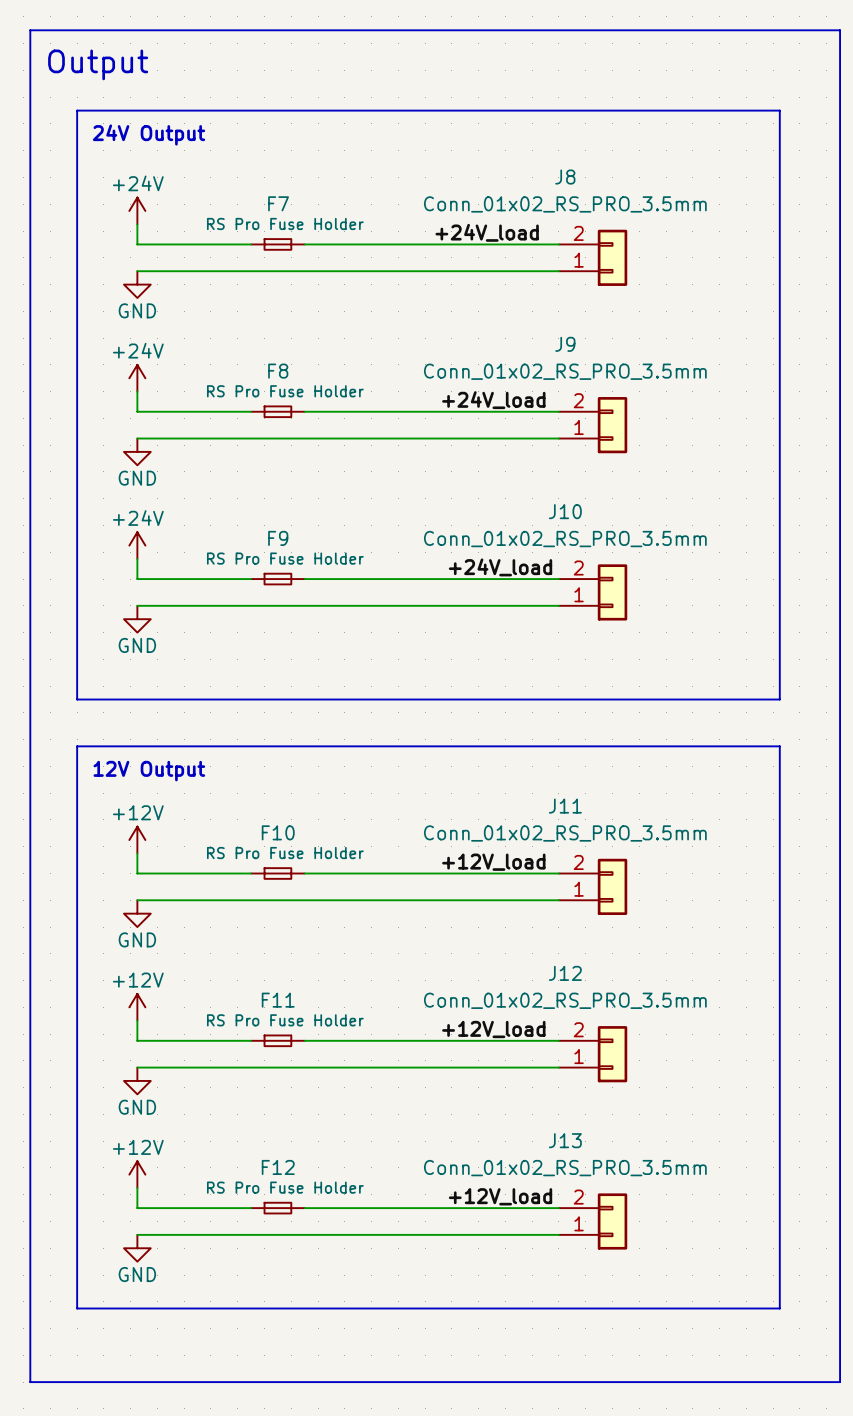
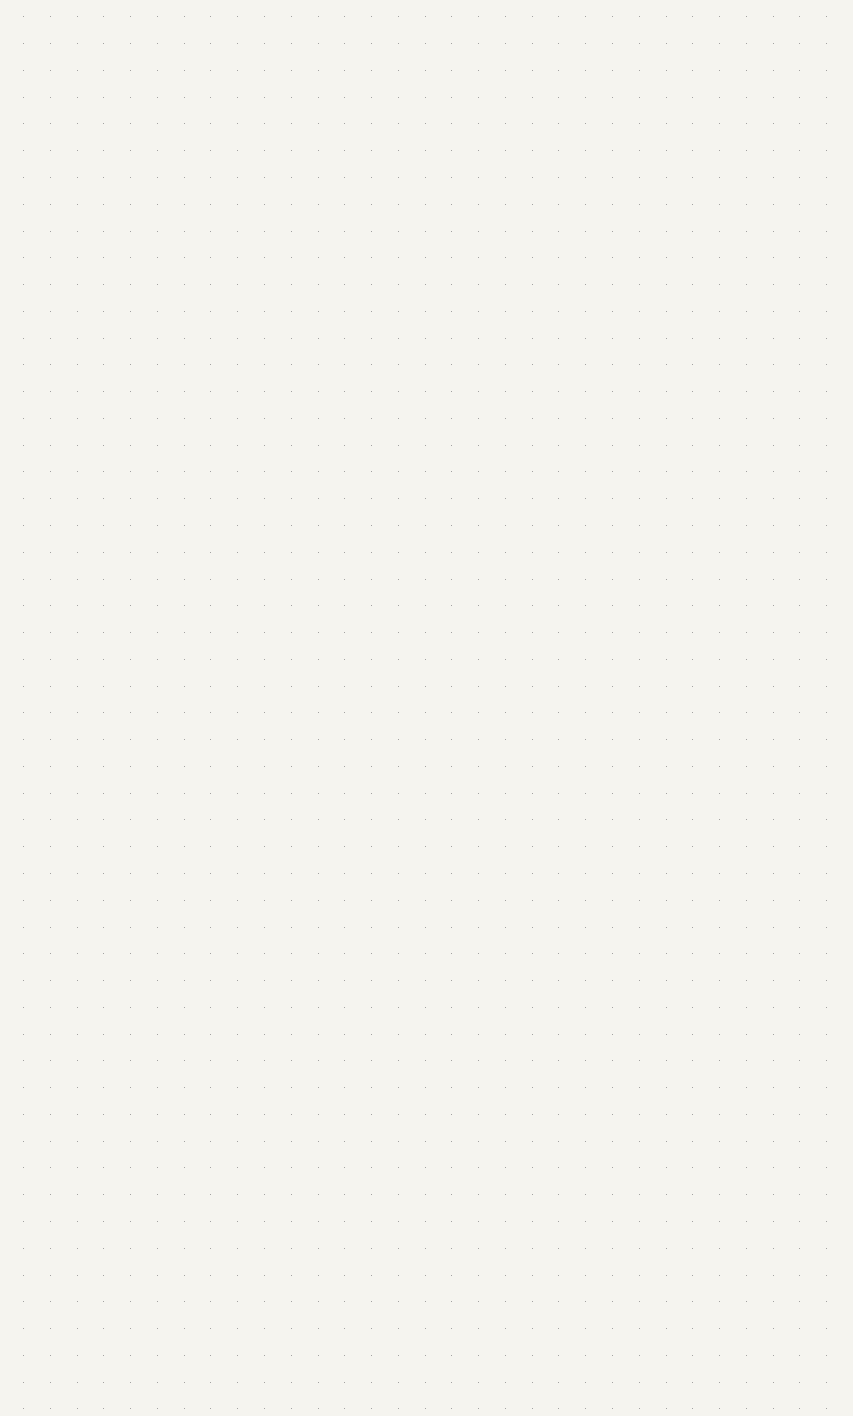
line: (30, 30) (840, 30) (840, 1382) (30, 1382) (30, 30) -> none
text: Output (98, 64) -> none
line: (77, 110) (779, 110) (779, 699) (77, 699) (77, 110) -> none
text: 24V Output (149, 135) -> none
power symbol: +24V (137, 210) -> none
wire: (137, 224) (137, 244) (251, 244) -> none
label: +24V_load (487, 232) -> none
F7: RS Pro Fuse Holder (277, 244) -> none
wire: (304, 244) (558, 244) -> none
J8: Conn_01x02_RS_PRO_3.5mm (593, 257) -> none
wire: (137, 271) (558, 271) -> none
power symbol: GND (137, 284) -> none
power symbol: +24V (137, 378) -> none
wire: (137, 391) (137, 411) (251, 411) -> none
label: +24V_load (493, 400) -> none
F8: RS Pro Fuse Holder (277, 411) -> none
wire: (304, 411) (558, 411) -> none
J9: Conn_01x02_RS_PRO_3.5mm (593, 425) -> none
wire: (137, 438) (558, 438) -> none
power symbol: GND (137, 451) -> none
power symbol: +24V (137, 545) -> none
wire: (137, 558) (137, 579) (251, 579) -> none
label: +24V_load (500, 567) -> none
F9: RS Pro Fuse Holder (277, 579) -> none
wire: (304, 579) (558, 579) -> none
J10: Conn_01x02_RS_PRO_3.5mm (593, 592) -> none
wire: (137, 605) (558, 605) -> none
power symbol: GND (137, 619) -> none
line: (77, 746) (77, 1308) (779, 1308) (779, 746) (77, 746) -> none
text: 12V Output (149, 771) -> none
power symbol: +12V (137, 840) -> none
wire: (137, 853) (137, 873) (251, 873) -> none
label: +12V_load (493, 862) -> none
F10: RS Pro Fuse Holder (277, 873) -> none
wire: (304, 873) (558, 873) -> none
J11: Conn_01x02_RS_PRO_3.5mm (593, 886) -> none
wire: (137, 900) (558, 900) -> none
power symbol: GND (137, 913) -> none
power symbol: +12V (137, 1007) -> none
wire: (137, 1020) (137, 1040) (251, 1040) -> none
label: +12V_load (493, 1029) -> none
F11: RS Pro Fuse Holder (277, 1040) -> none
wire: (304, 1040) (558, 1040) -> none
J12: Conn_01x02_RS_PRO_3.5mm (593, 1054) -> none
wire: (137, 1067) (558, 1067) -> none
power symbol: GND (137, 1080) -> none
power symbol: +12V (137, 1174) -> none
wire: (137, 1188) (137, 1208) (251, 1208) -> none
label: +12V_load (500, 1196) -> none
F12: RS Pro Fuse Holder (277, 1208) -> none
wire: (304, 1208) (558, 1208) -> none
J13: Conn_01x02_RS_PRO_3.5mm (593, 1221) -> none
wire: (137, 1234) (558, 1234) -> none
power symbol: GND (137, 1248) -> none

